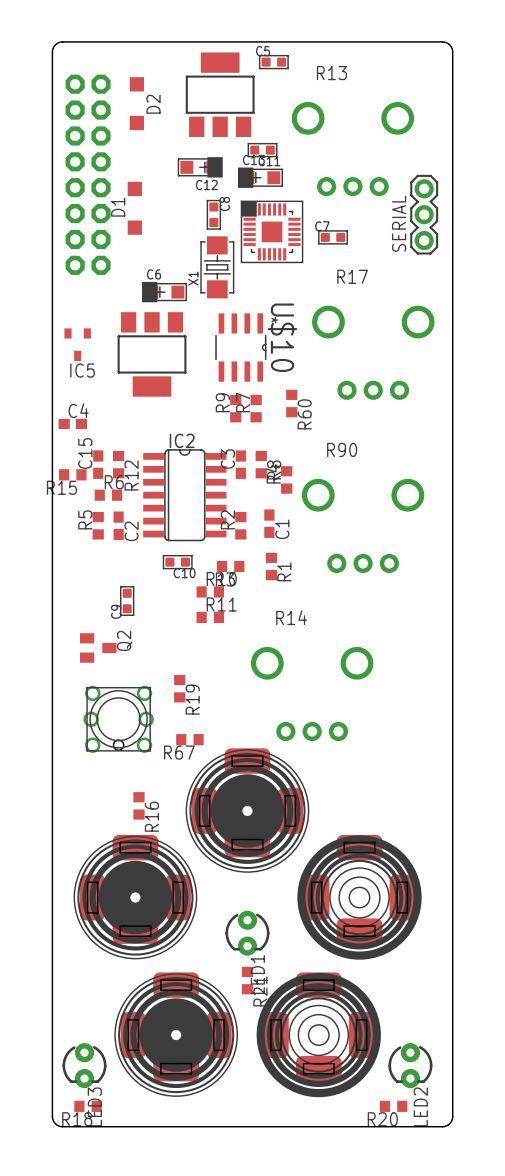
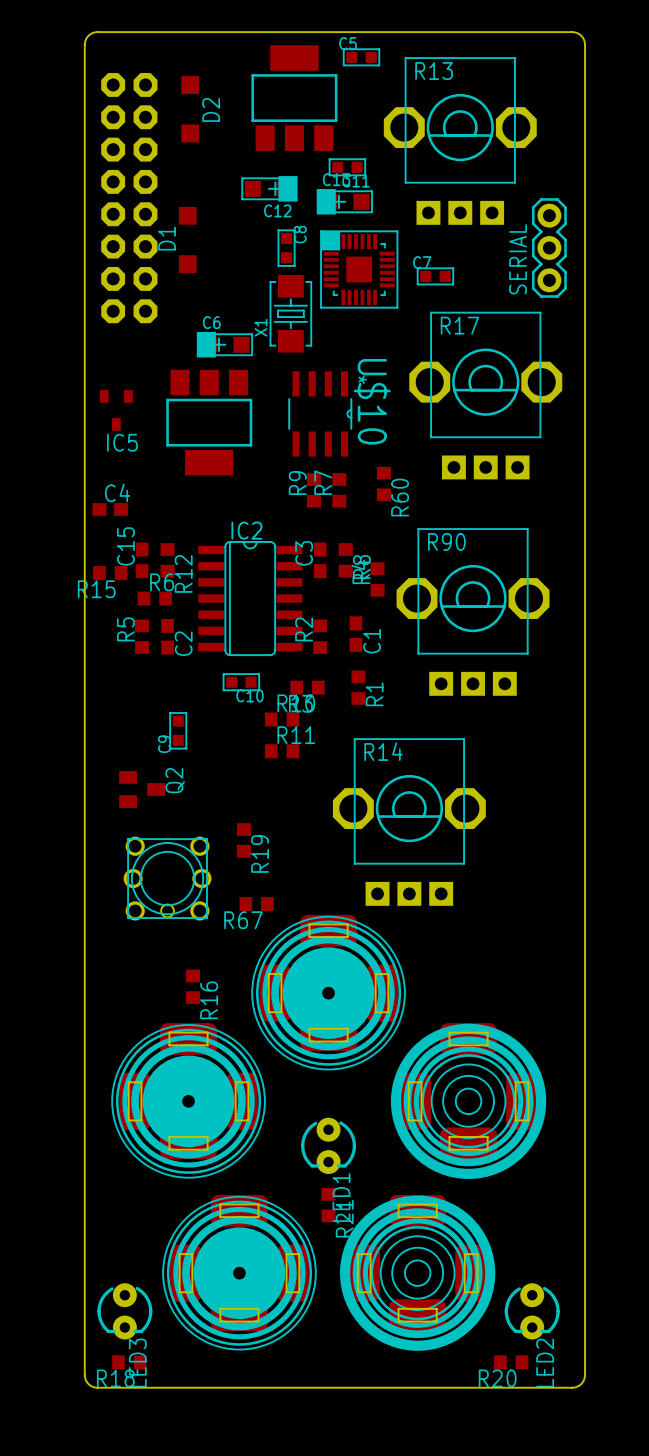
R13 footprint: [291, 101, 415, 197] -> [383, 57, 537, 225]
R17 footprint: [312, 305, 435, 400] -> [409, 311, 563, 480]
R90 footprint: [301, 478, 425, 574] -> [396, 528, 550, 696]
R14 footprint: [250, 646, 374, 742] -> [332, 738, 486, 906]

